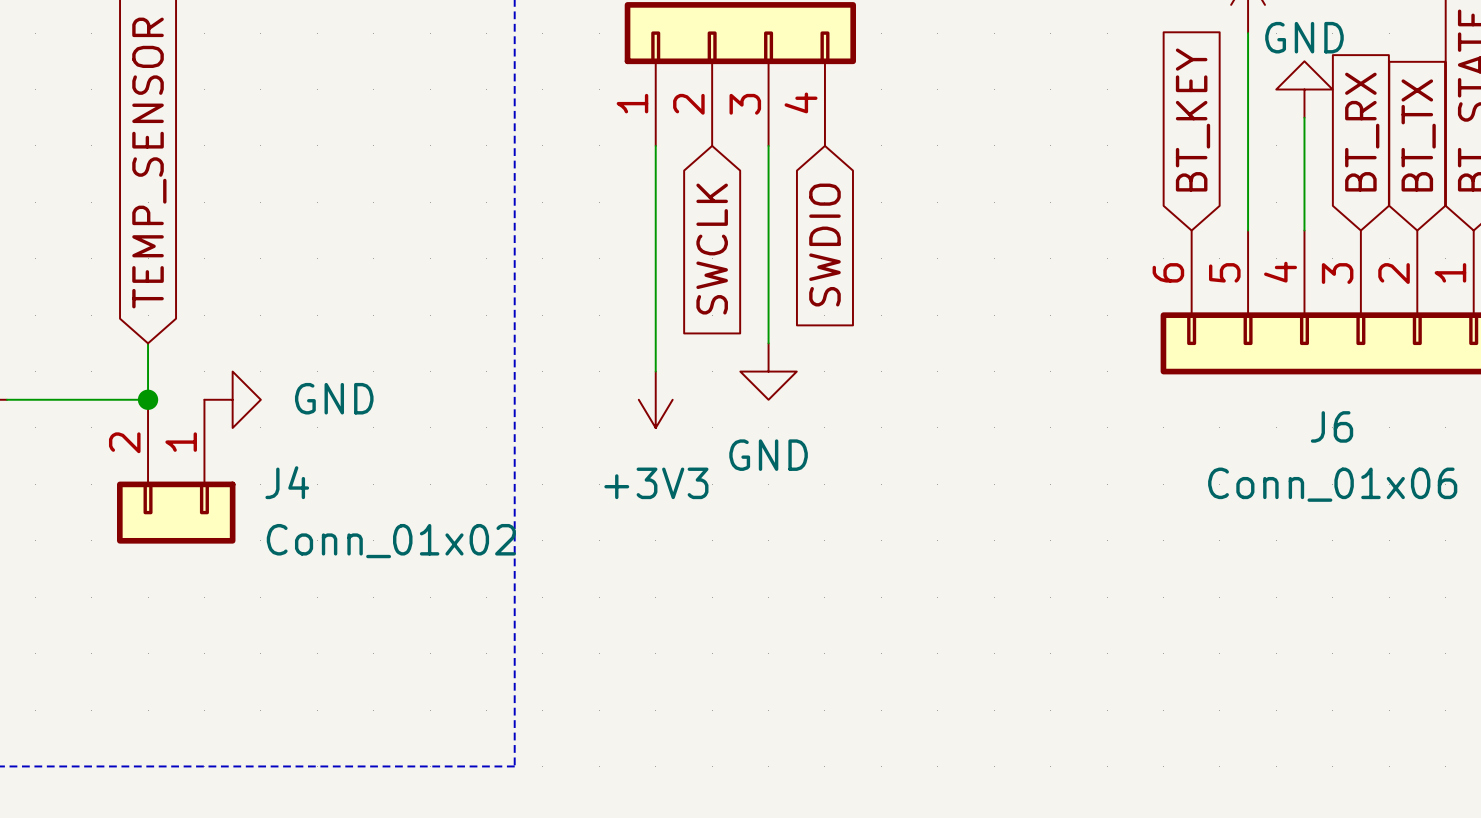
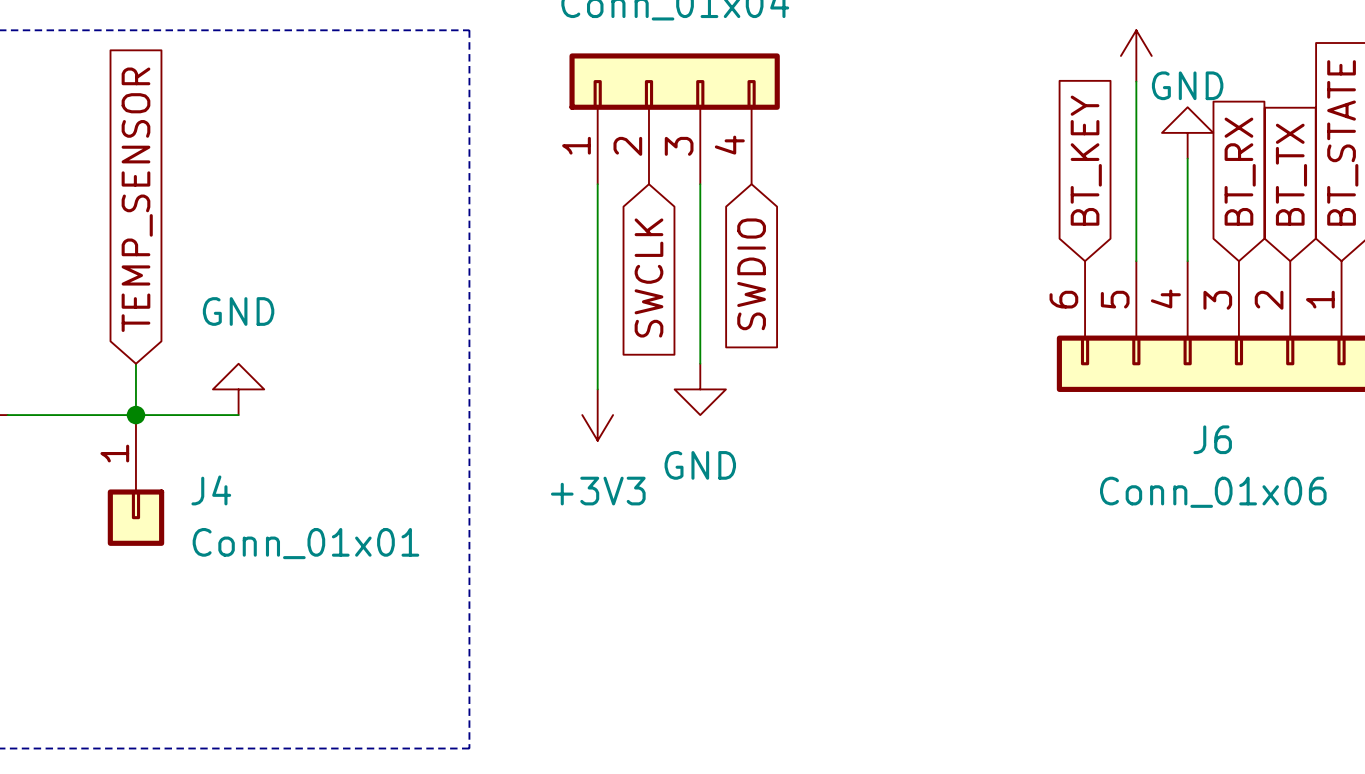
J4 symbol: [117, 399, 236, 544] -> [107, 415, 165, 546]
wire: none -> (135, 415) (238, 415)
power symbol rotation: 0° (232, 399) -> 90° counterclockwise (238, 389)
power symbol position: GND (232, 399) -> GND (238, 389)
J4 value: Conn_01x02 (391, 541) -> Conn_01x01 (305, 543)

